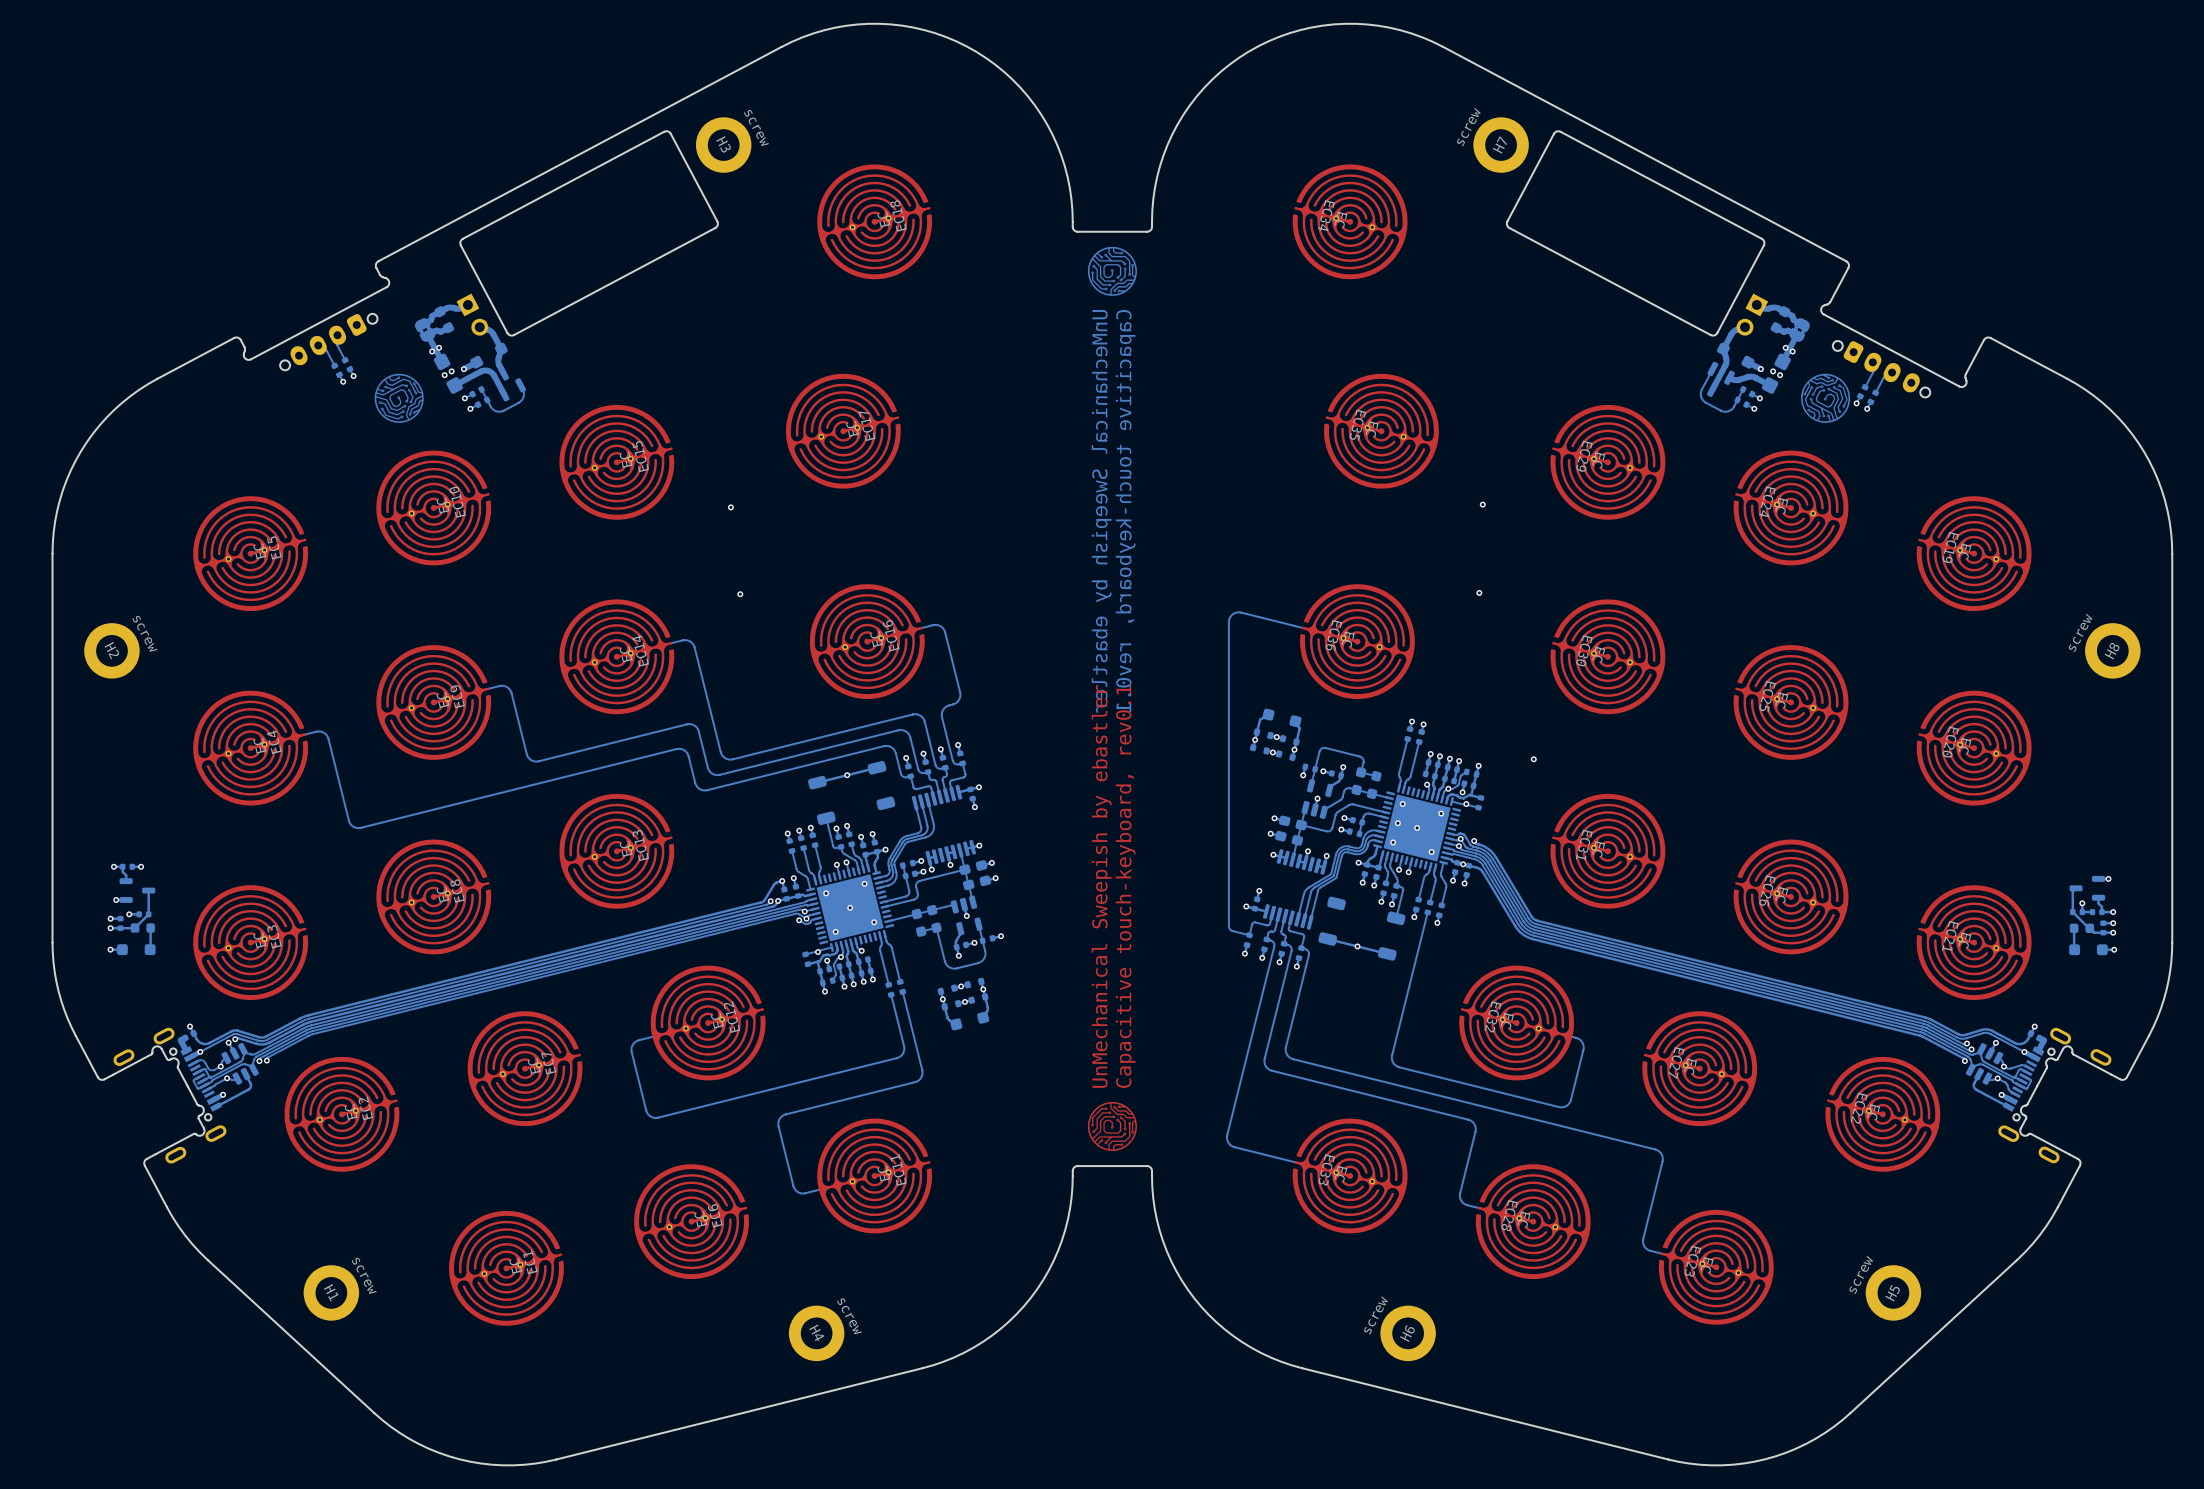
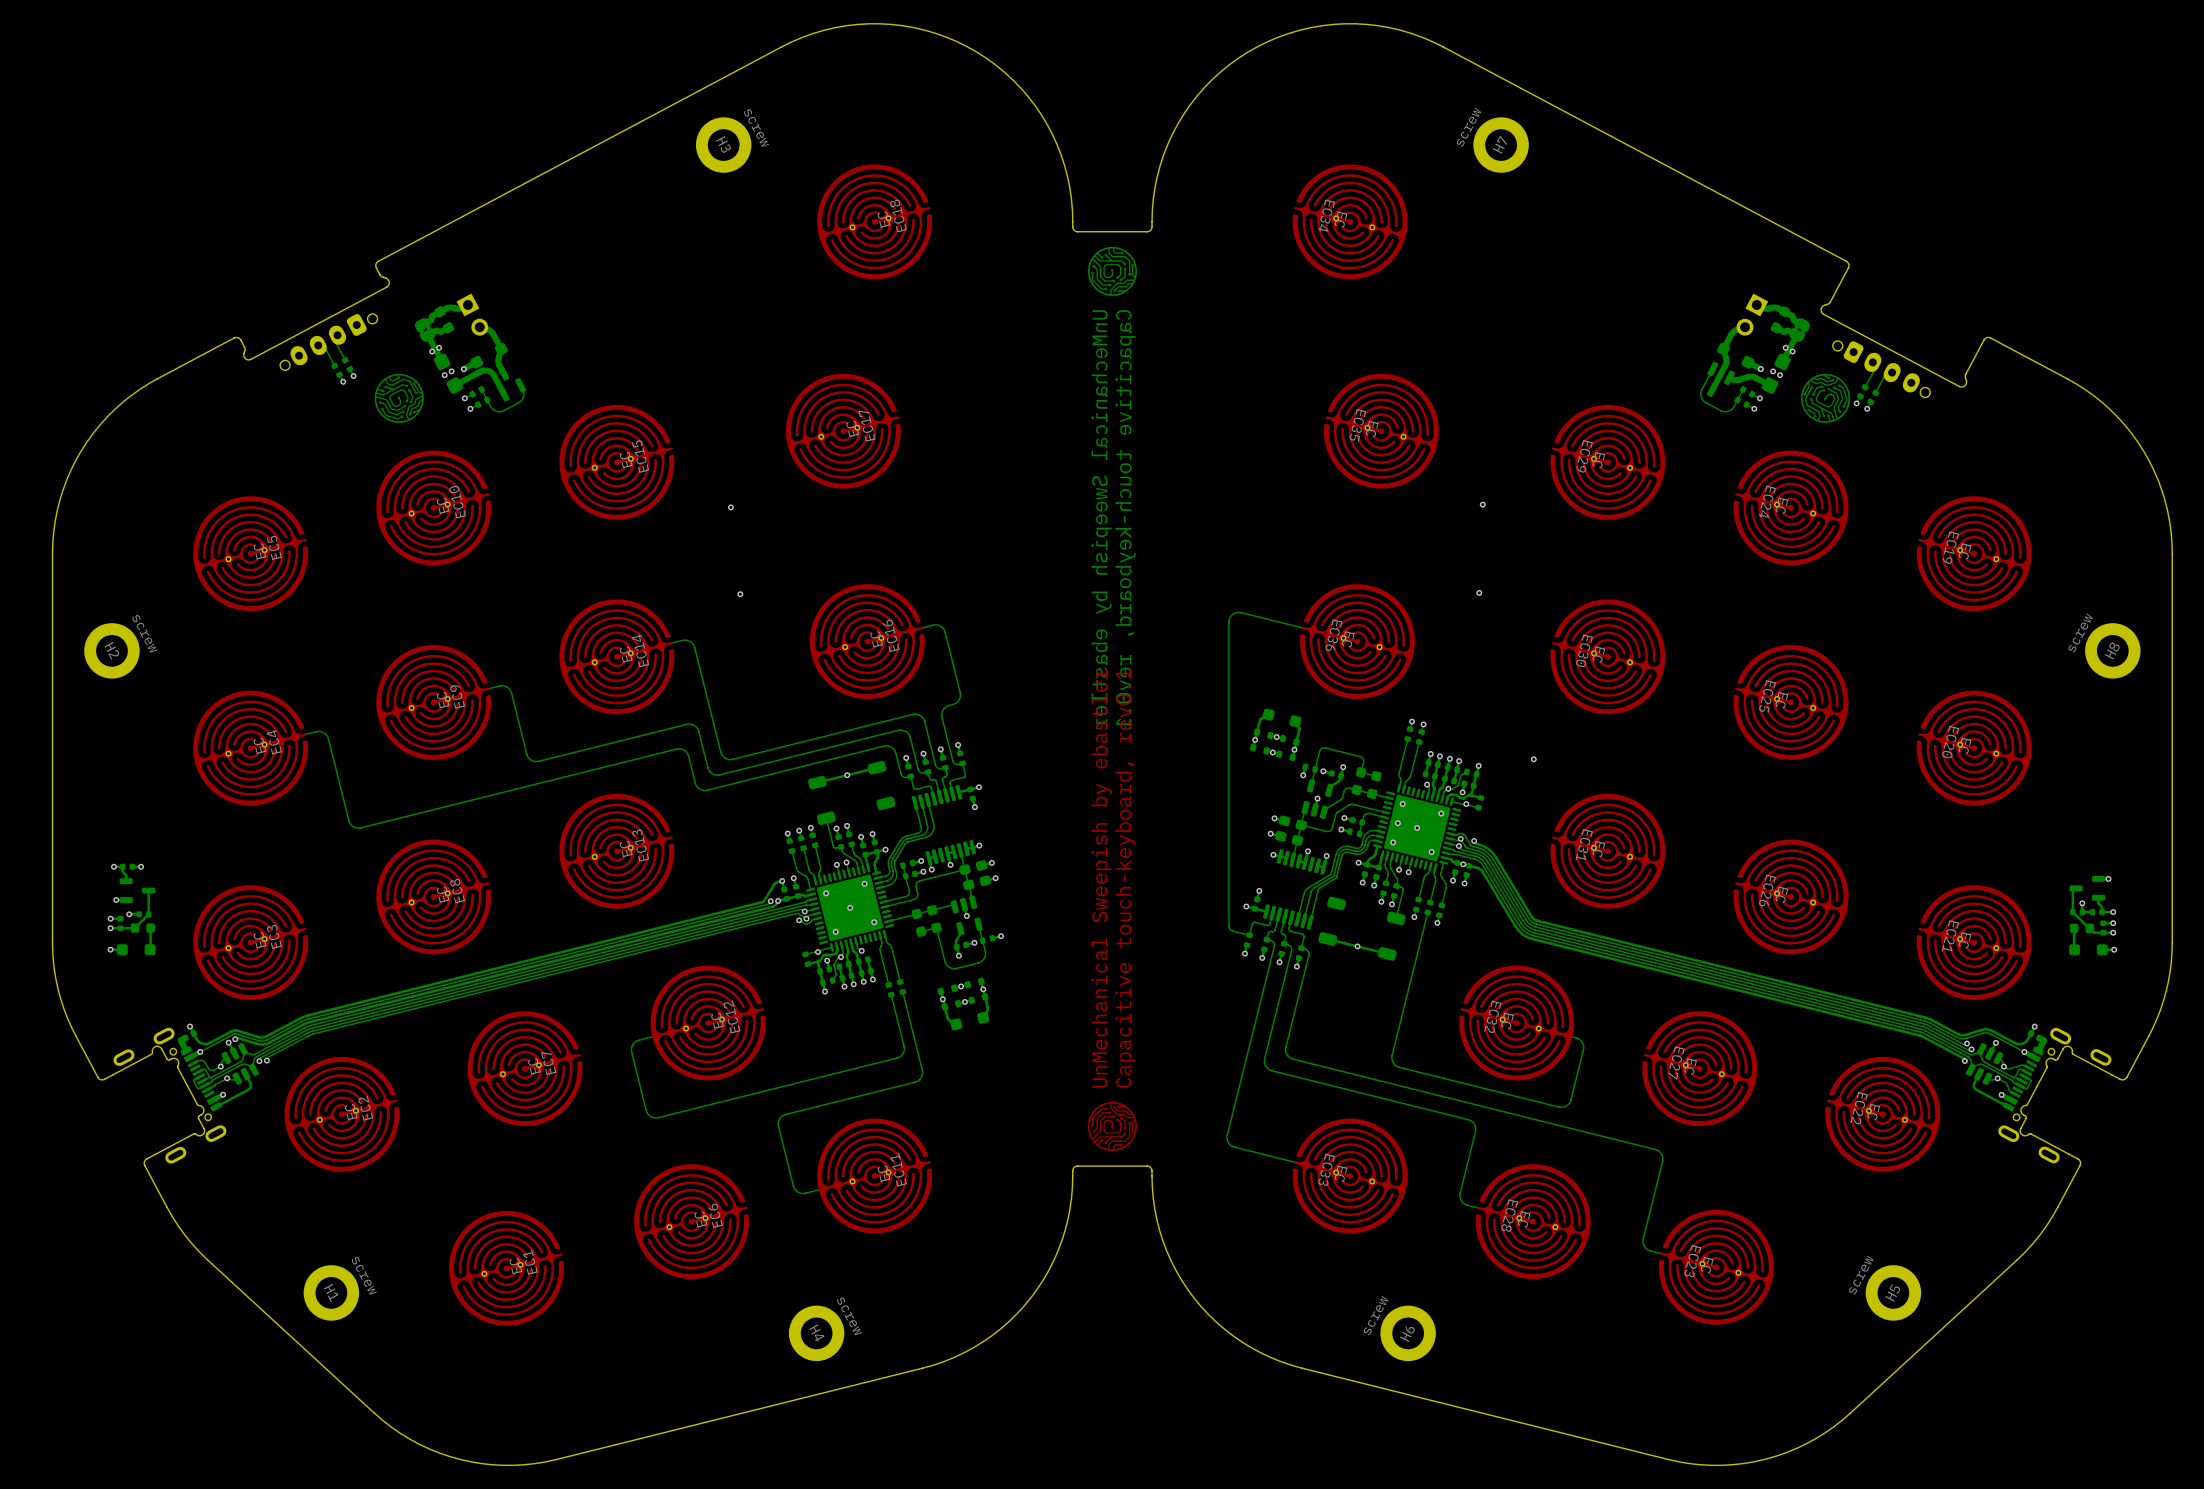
board edge: (664, 131) (461, 240) (460, 245) (508, 334) (514, 335) (716, 226) (717, 221) (670, 133) (664, 131) -> none
board edge: (1560, 131) (1763, 240) (1763, 245) (1716, 334) (1710, 335) (1508, 226) (1507, 221) (1553, 133) (1560, 131) -> none

